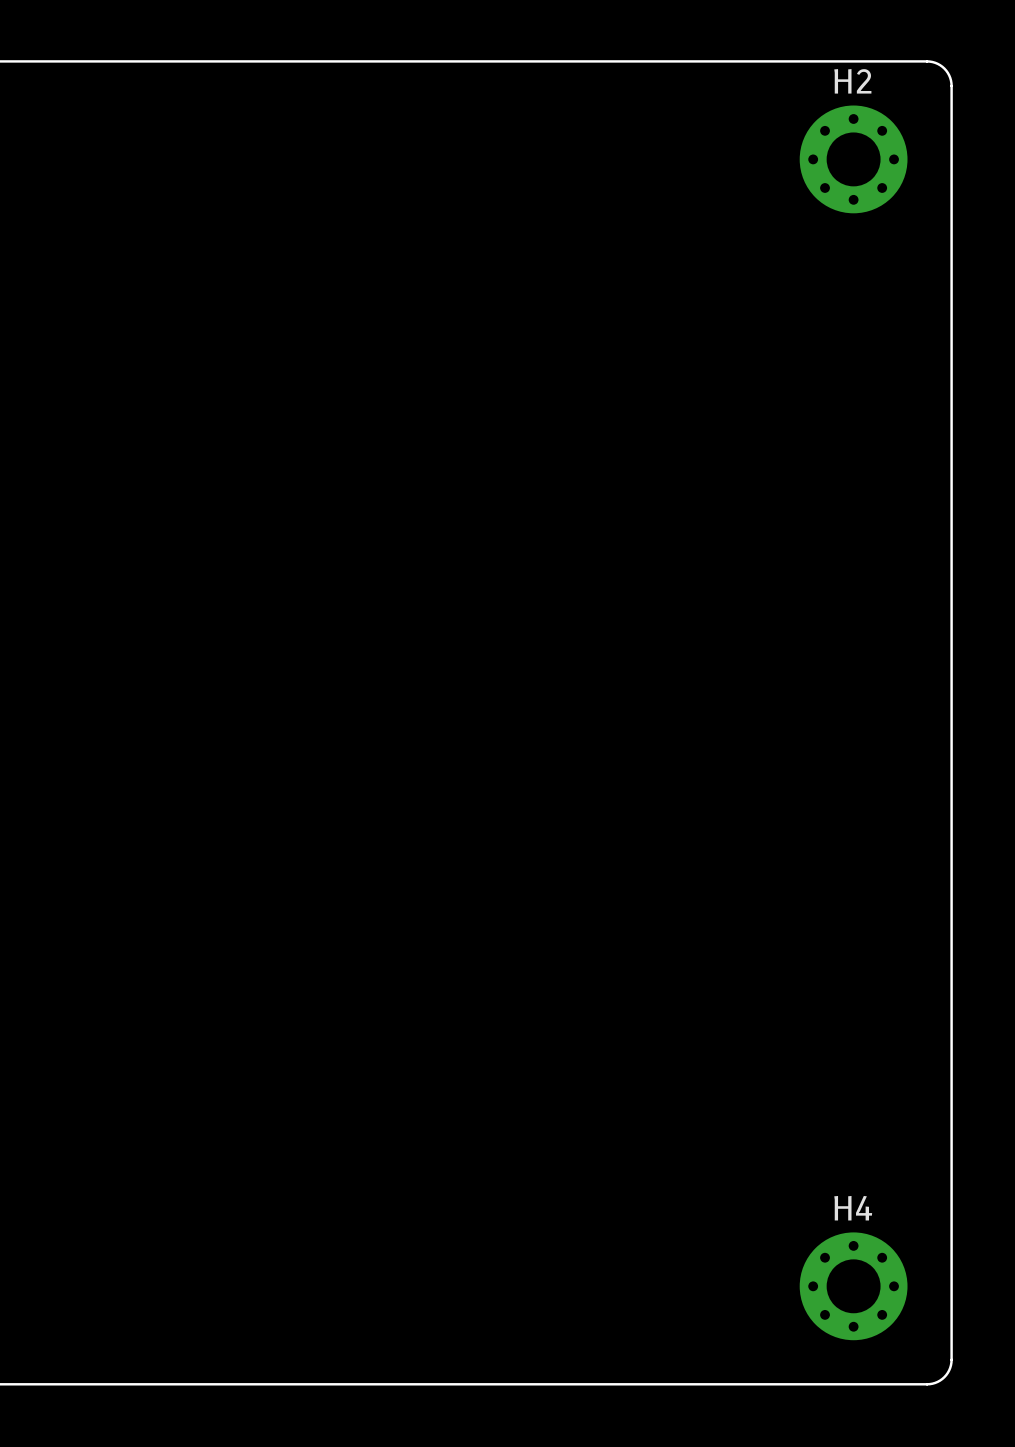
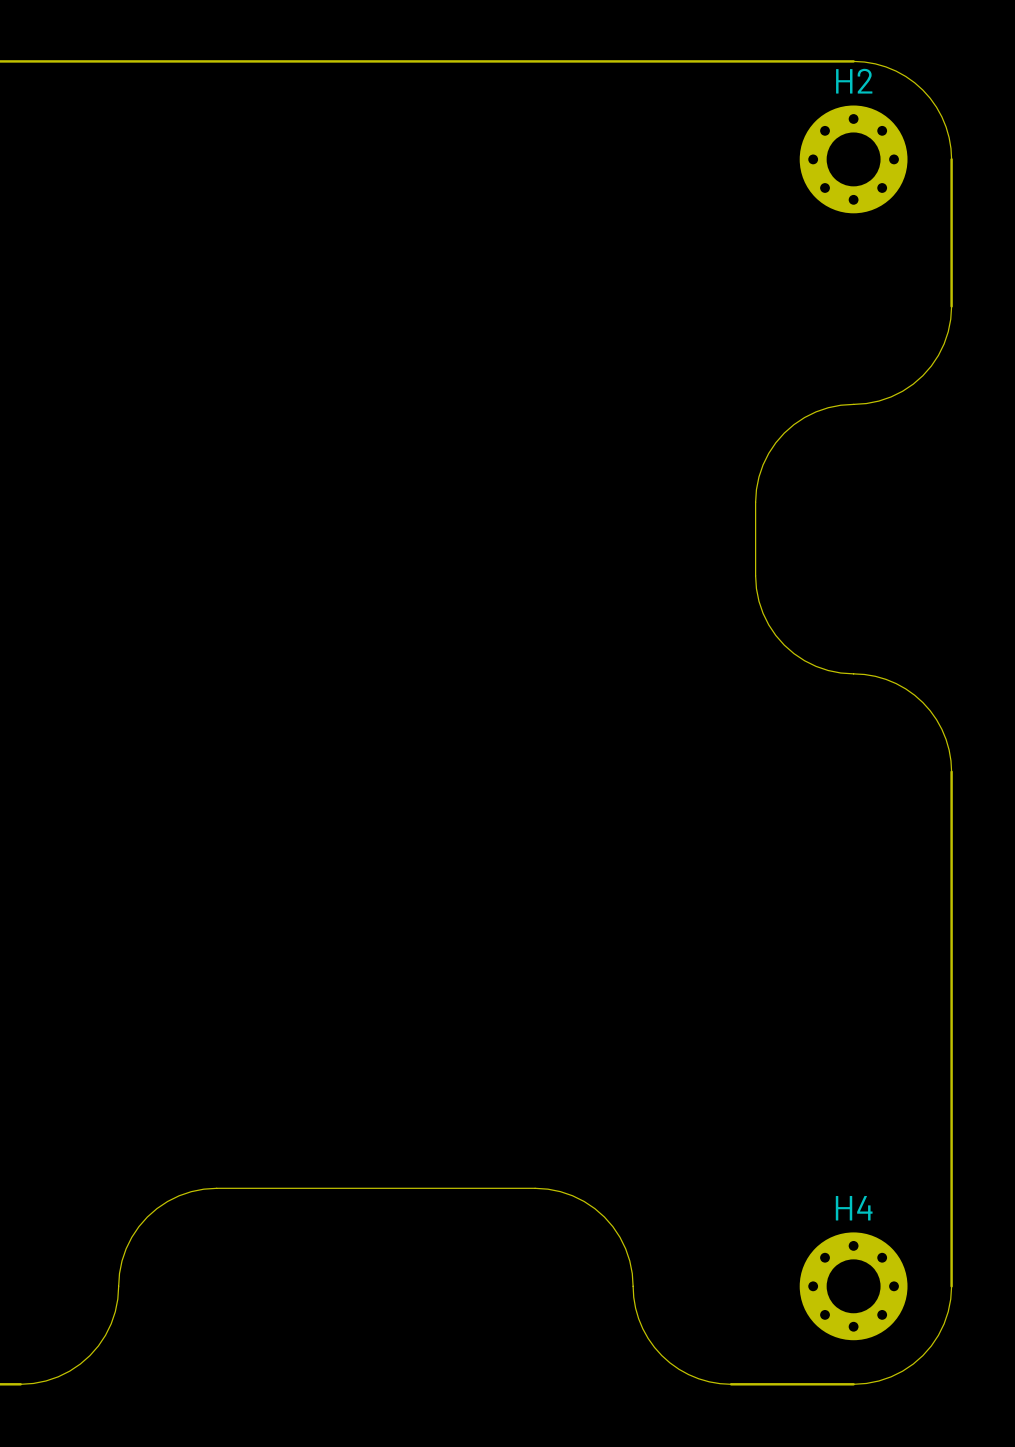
board edge: (853, 61) (929, 61) (944, 68) (951, 83) (951, 159) -> (853, 61) (885, 66) (905, 76) (922, 90) (936, 107) (946, 127) (951, 159)
board edge: (951, 306) (951, 771) -> (951, 306) (950, 319) (944, 343) (938, 355) (922, 375) (902, 391) (891, 396) (866, 403) (828, 407) (804, 417) (793, 424) (775, 442) (763, 464) (758, 477) (755, 502) (756, 588) (763, 613) (775, 635) (793, 653) (816, 666) (840, 673) (864, 674) (885, 679) (914, 695) (930, 710) (941, 729) (949, 750) (951, 771)
board edge: (951, 1286) (951, 1362) (944, 1377) (929, 1384) (853, 1384) -> (951, 1286) (948, 1311) (944, 1323) (931, 1345) (922, 1355) (913, 1364) (891, 1376) (878, 1380) (853, 1384)
board edge: (20, 1384) (731, 1384) -> (20, 1384) (33, 1383) (58, 1376) (80, 1364) (98, 1345) (111, 1323) (115, 1311) (119, 1273) (126, 1248) (131, 1237) (147, 1217) (167, 1201) (179, 1195) (203, 1189) (216, 1188) (535, 1188) (560, 1191) (572, 1195) (584, 1201) (604, 1217) (619, 1237) (629, 1260) (633, 1297) (638, 1318) (654, 1347) (670, 1362) (688, 1374) (709, 1381) (731, 1384)

